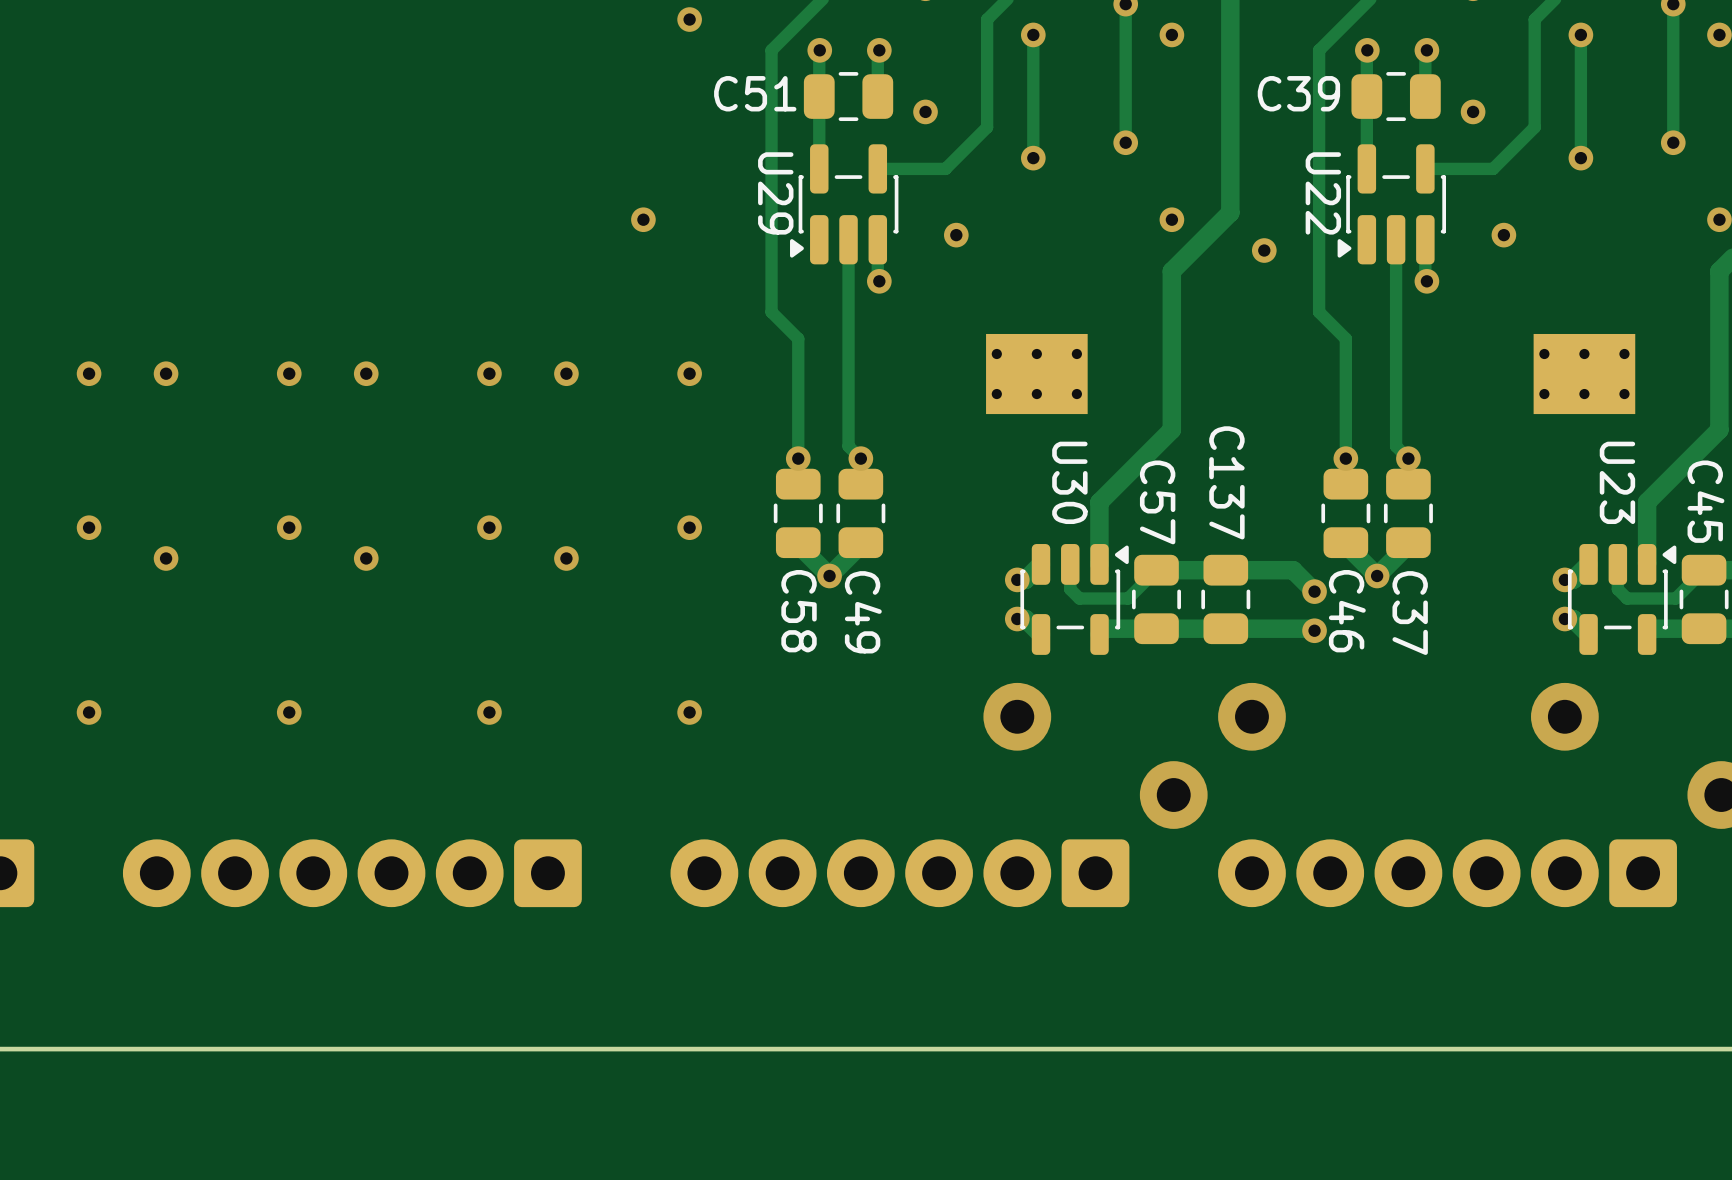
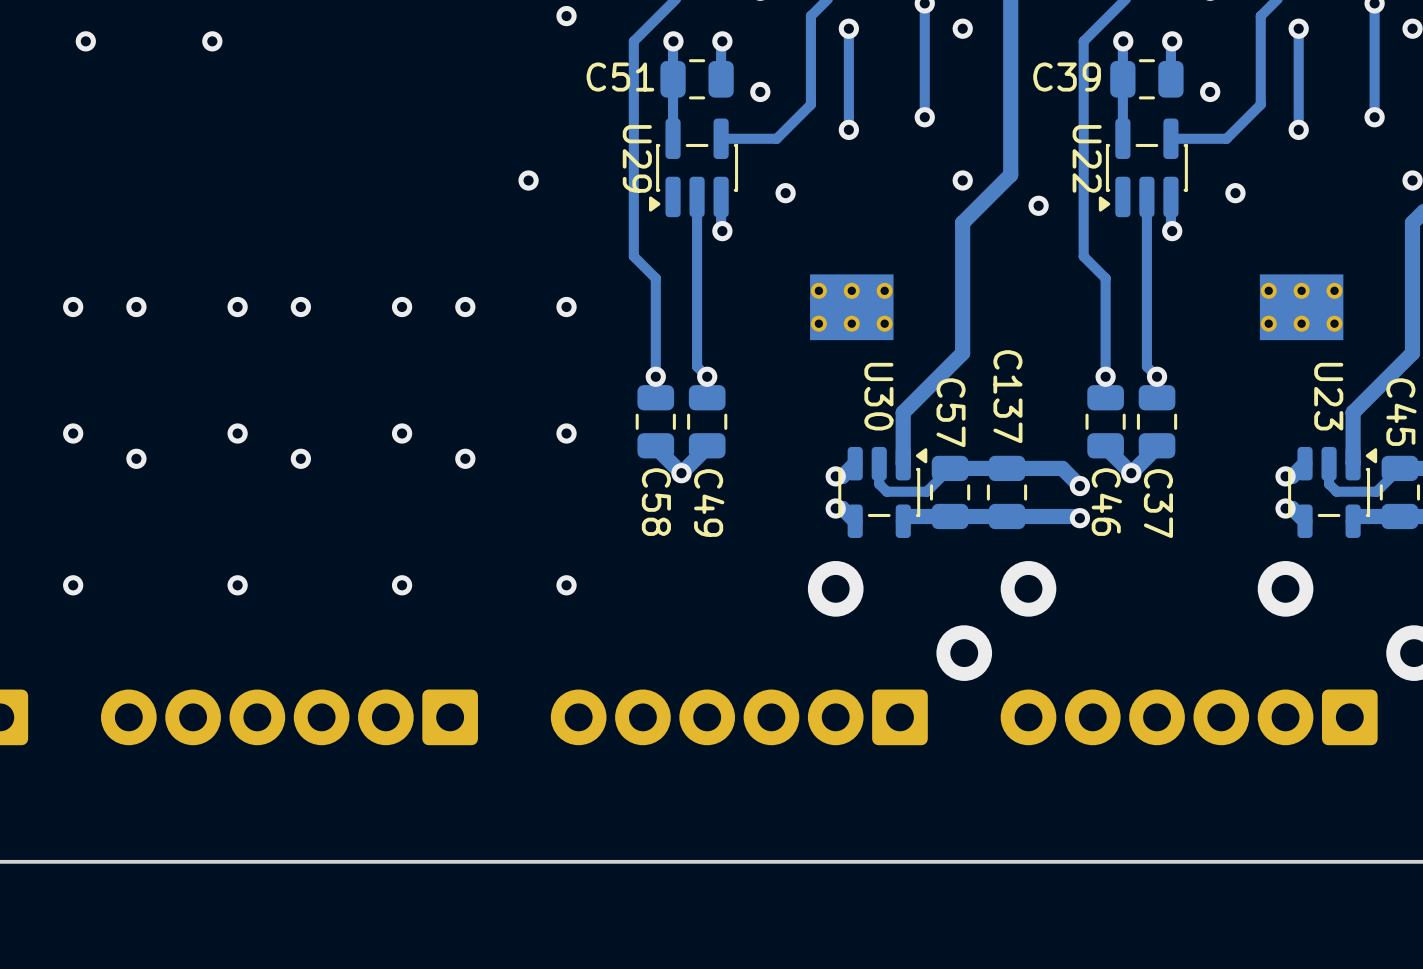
via: none -> (85, 41)
via: none -> (212, 41)

